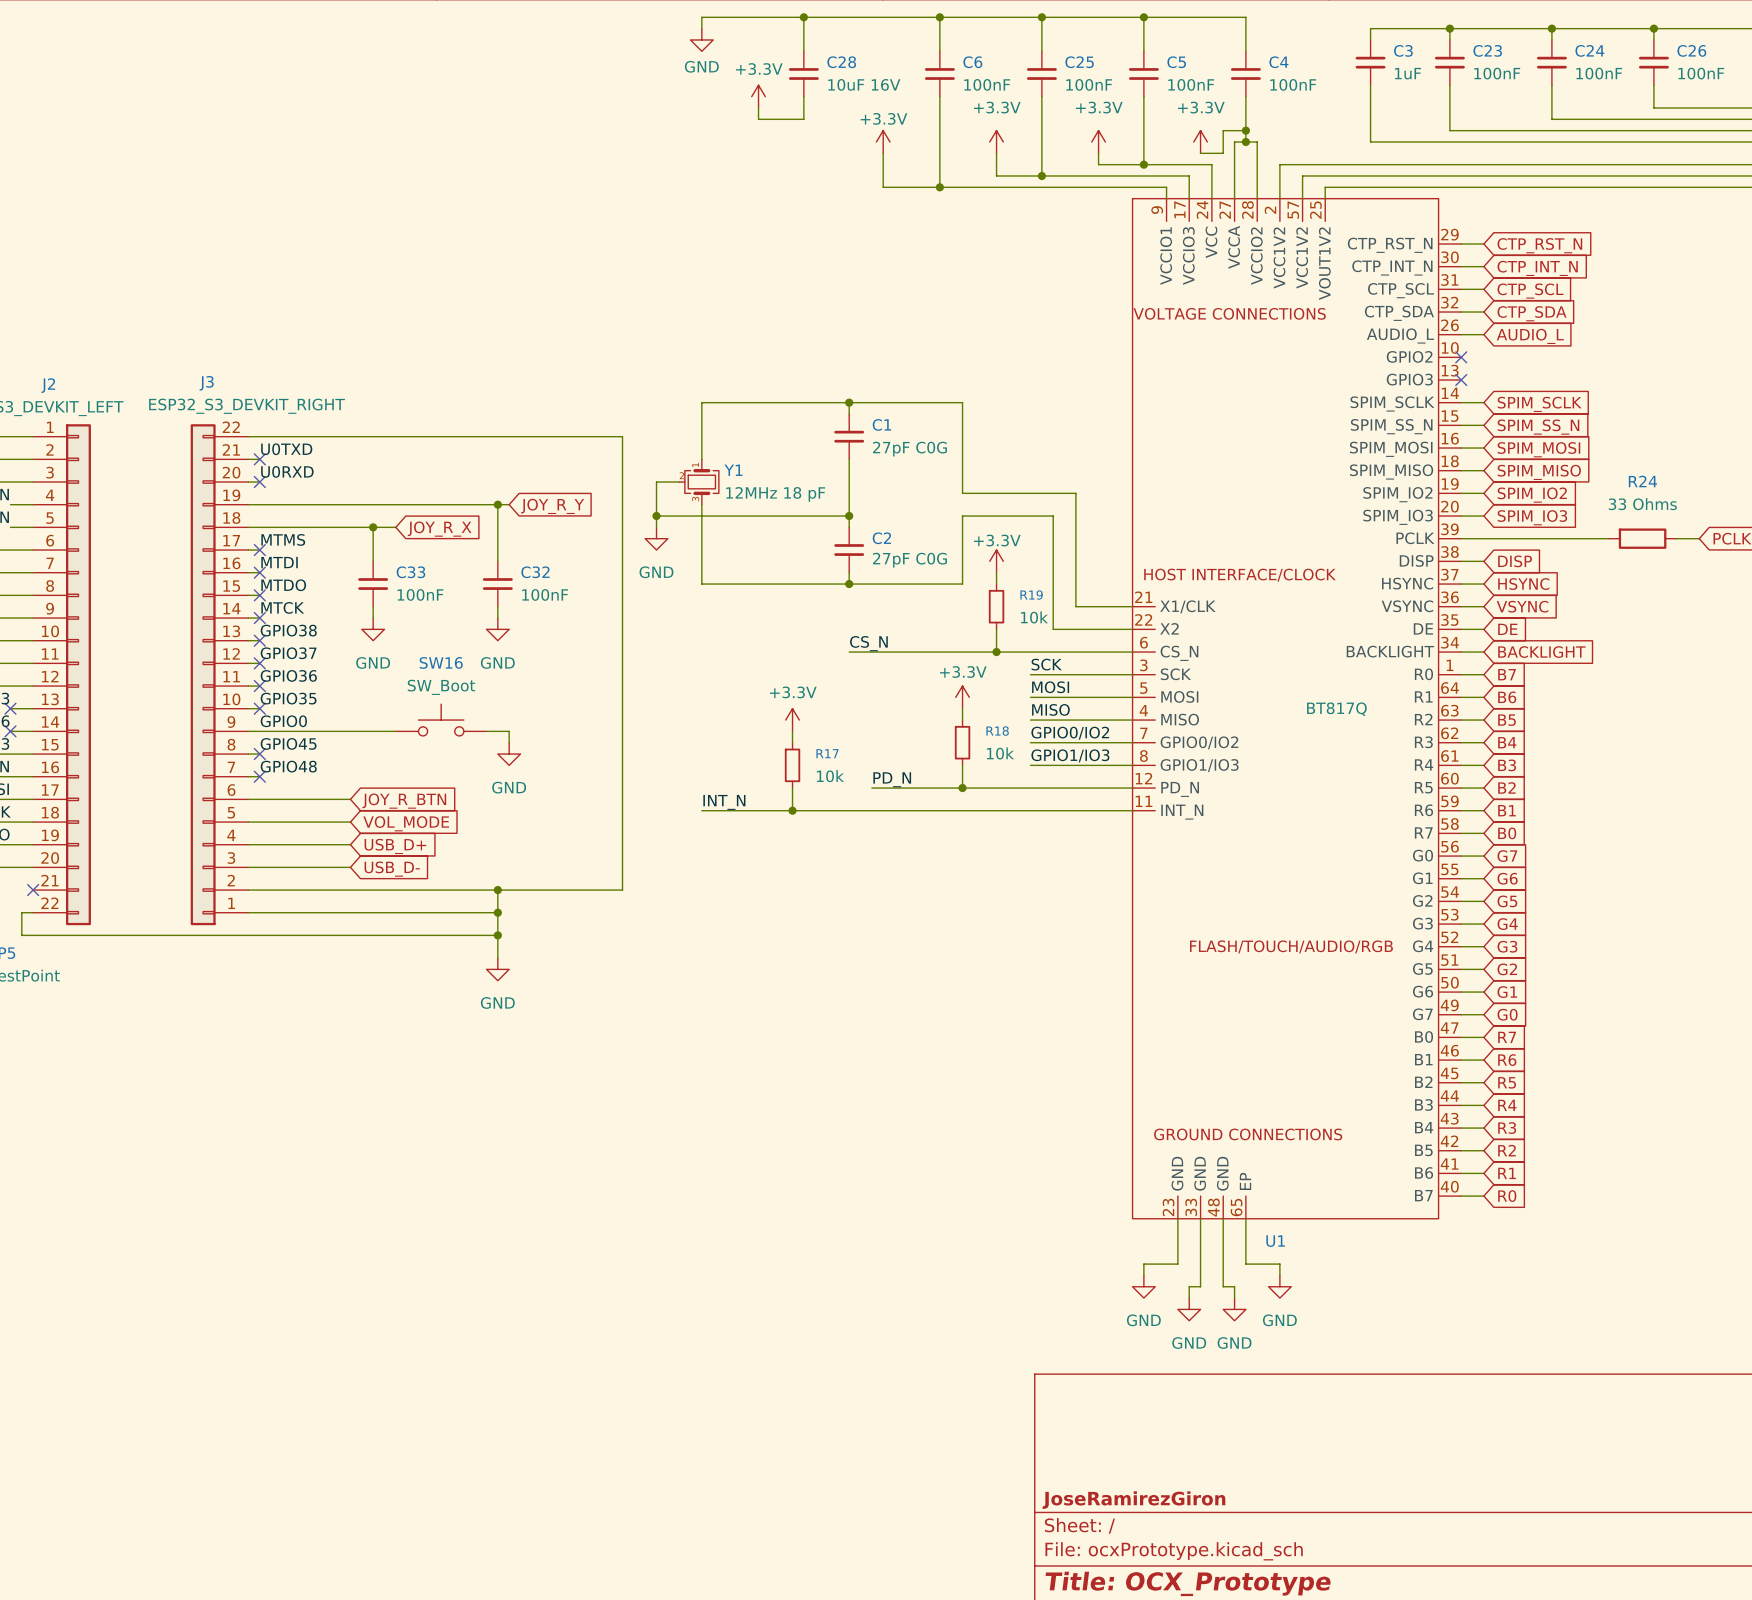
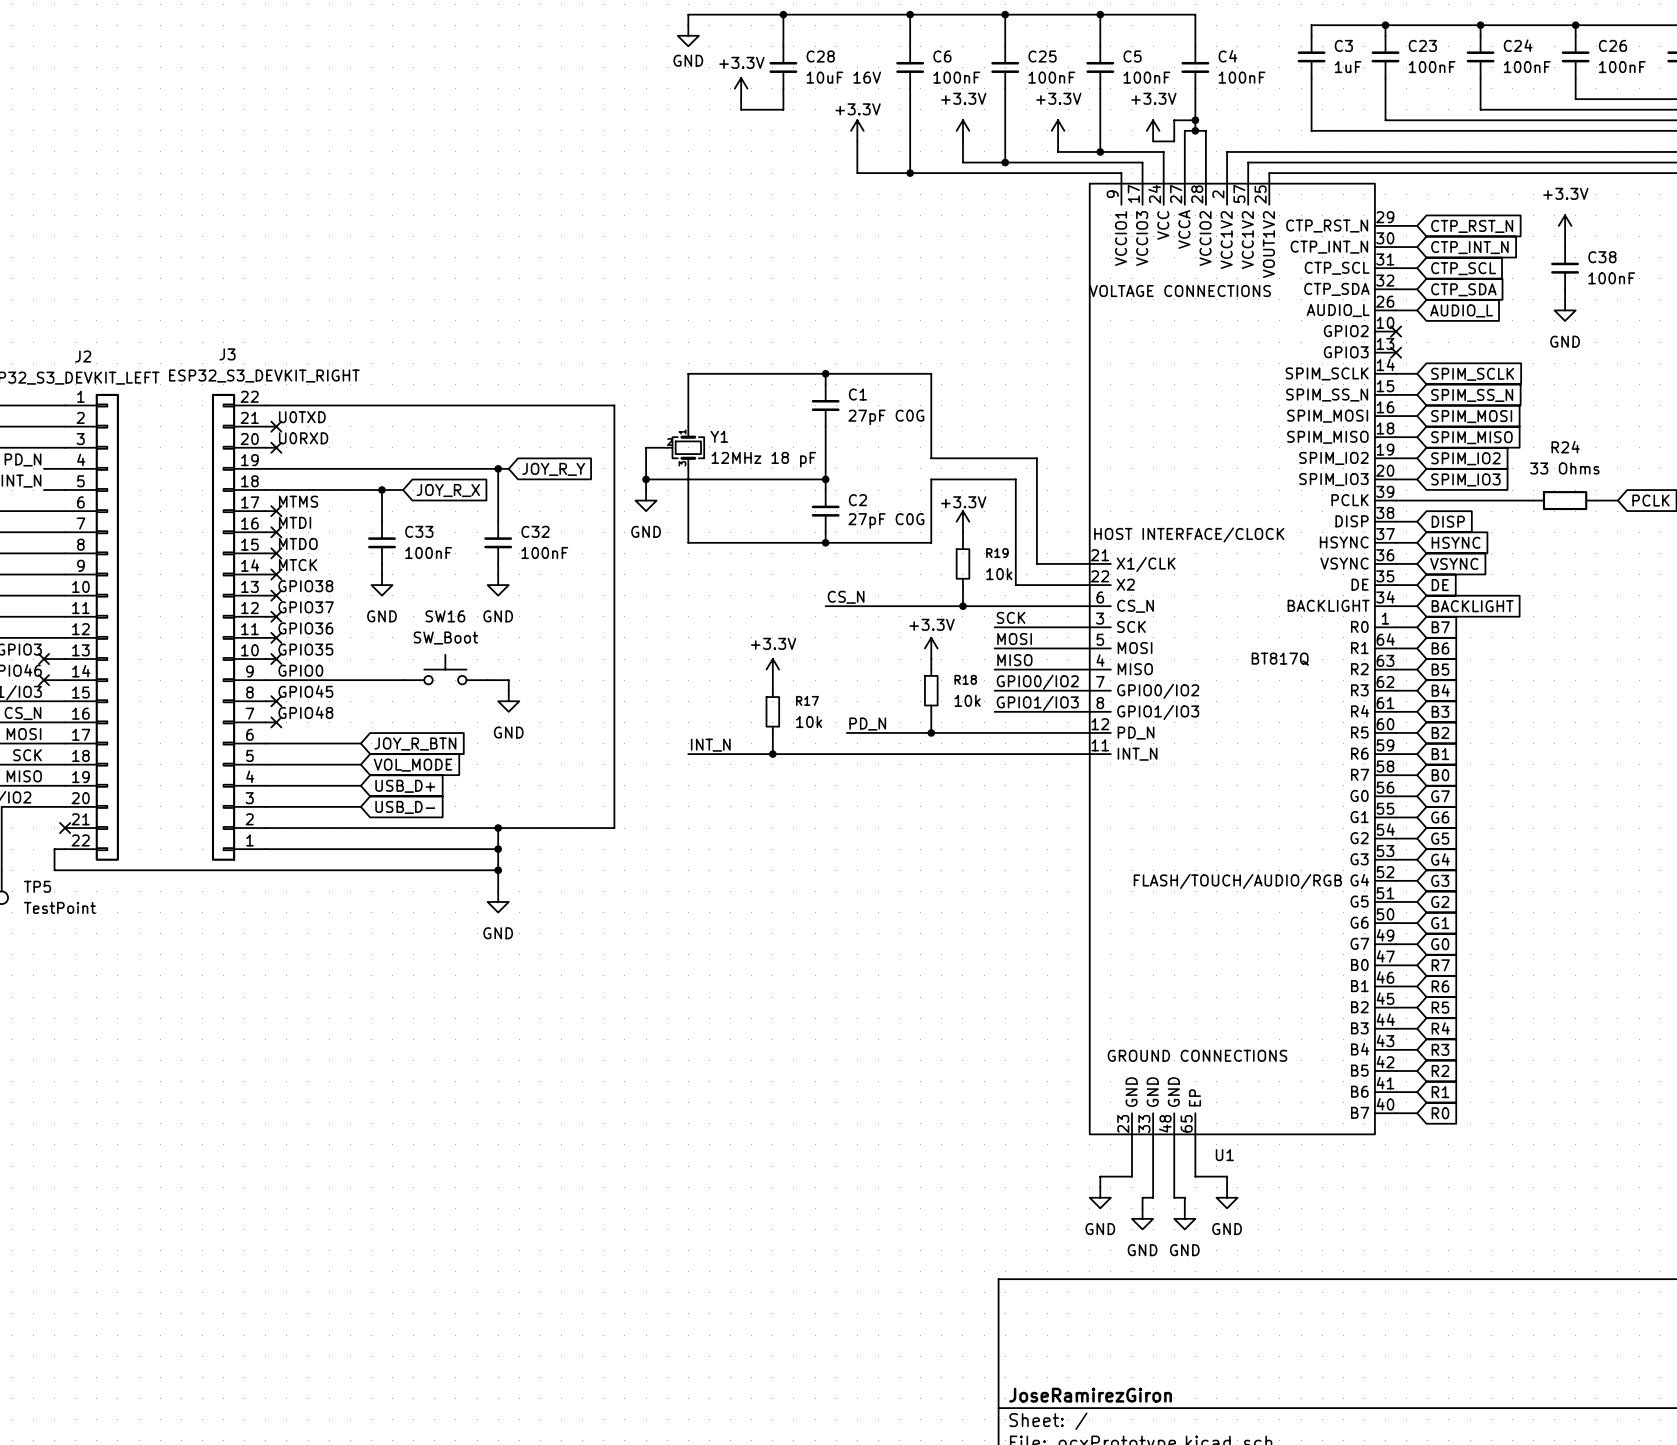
power symbol: none -> +3.3V (1565, 225)
wire: none -> (1565, 236) (1565, 247)
C38: none -> 100nF (1565, 268)
wire: none -> (1565, 289) (1565, 299)
power symbol: none -> GND (1565, 310)

